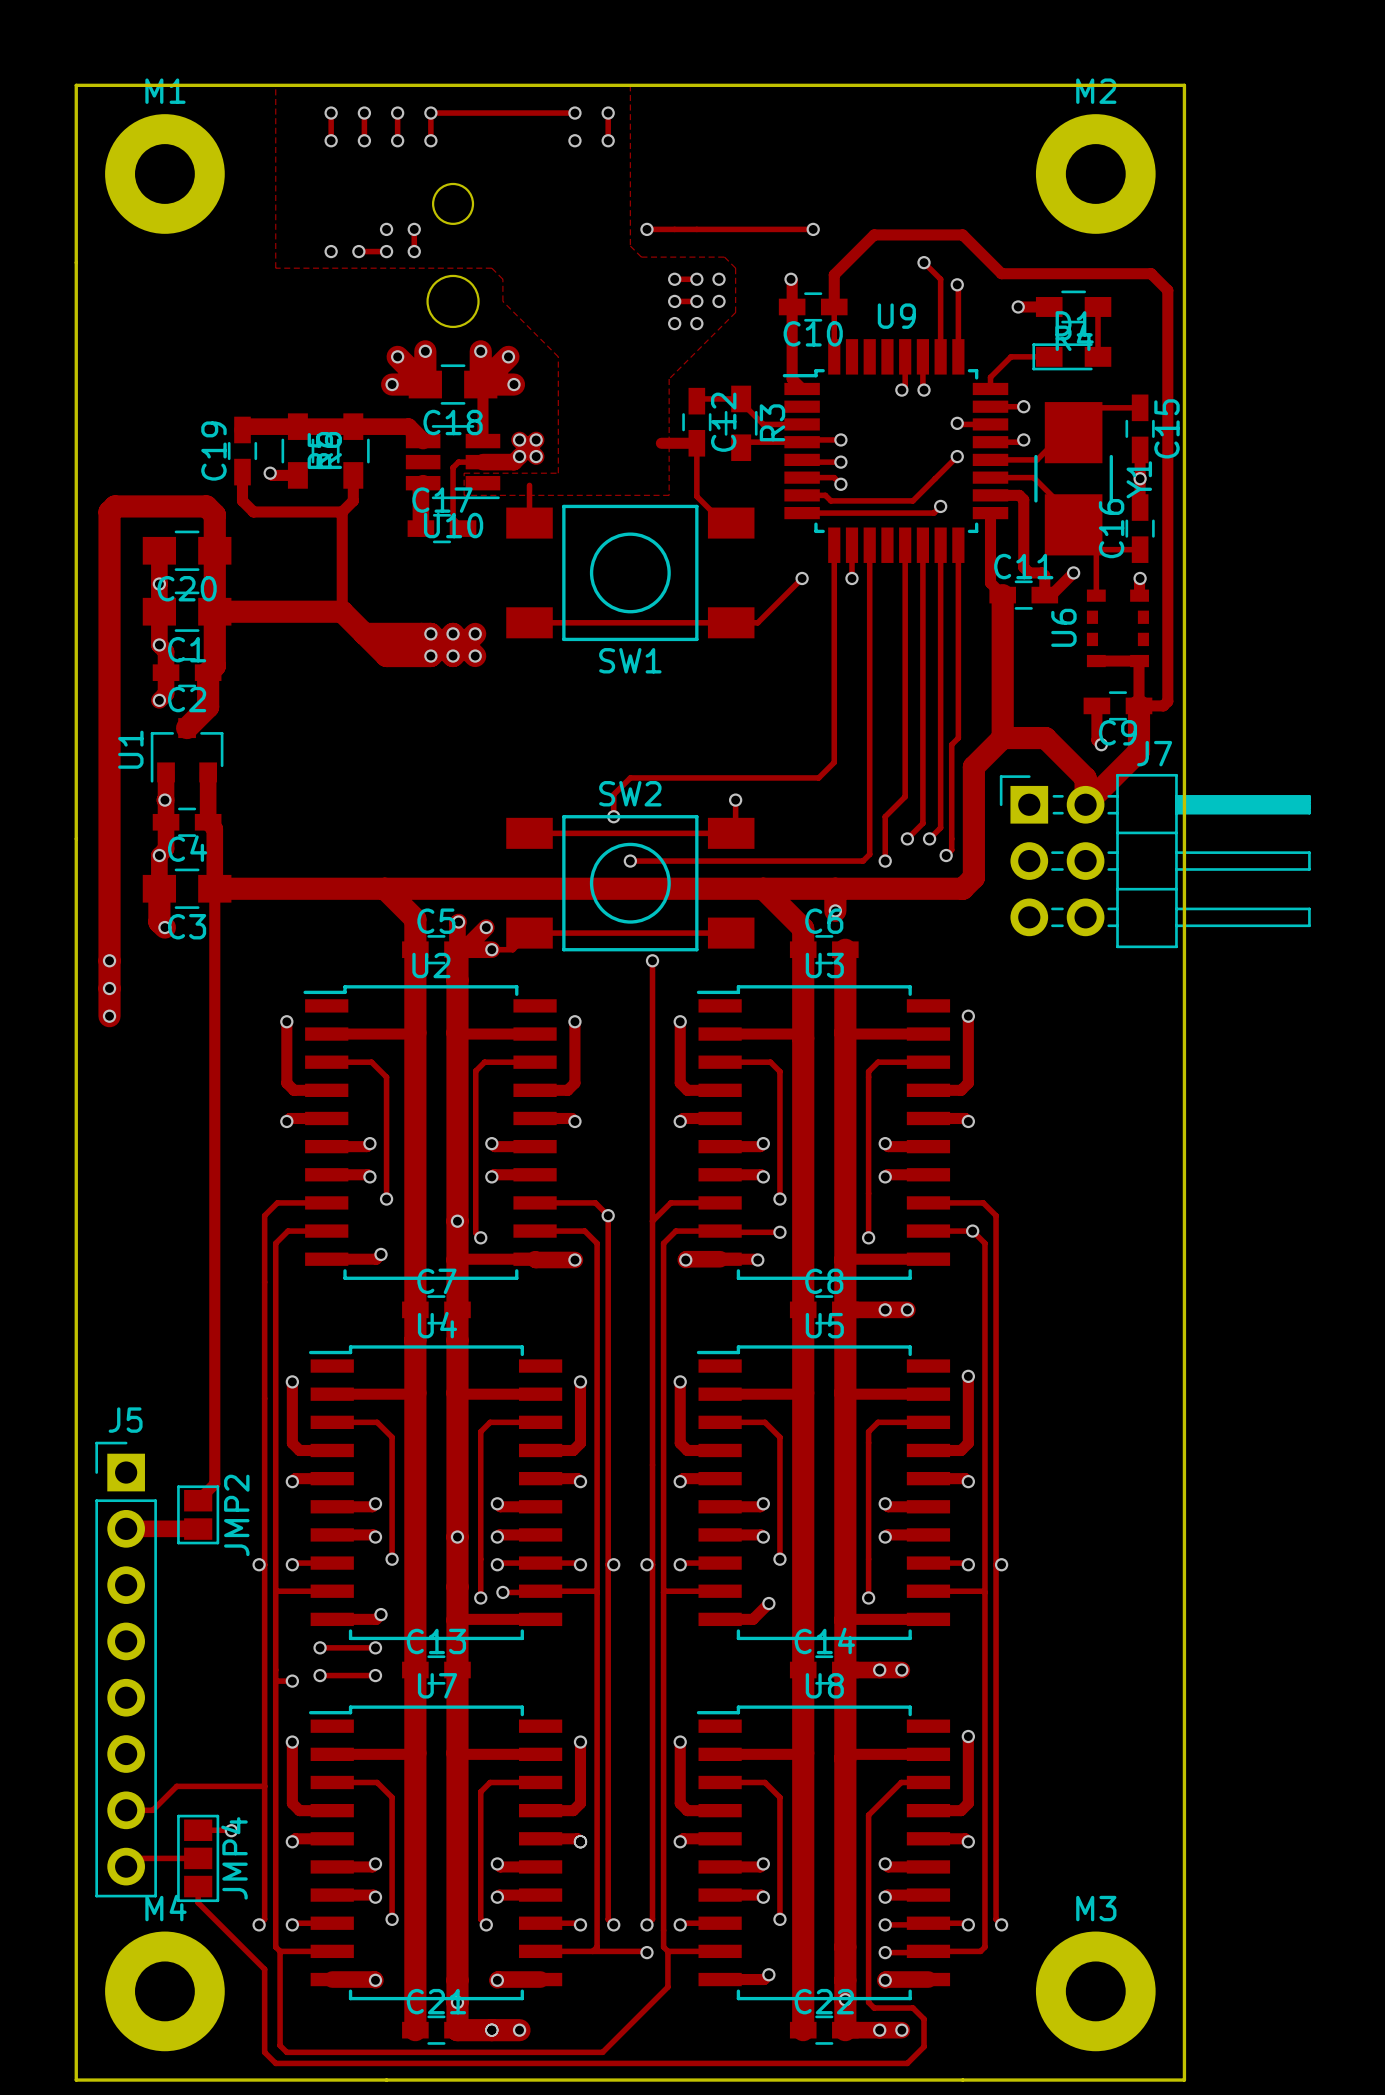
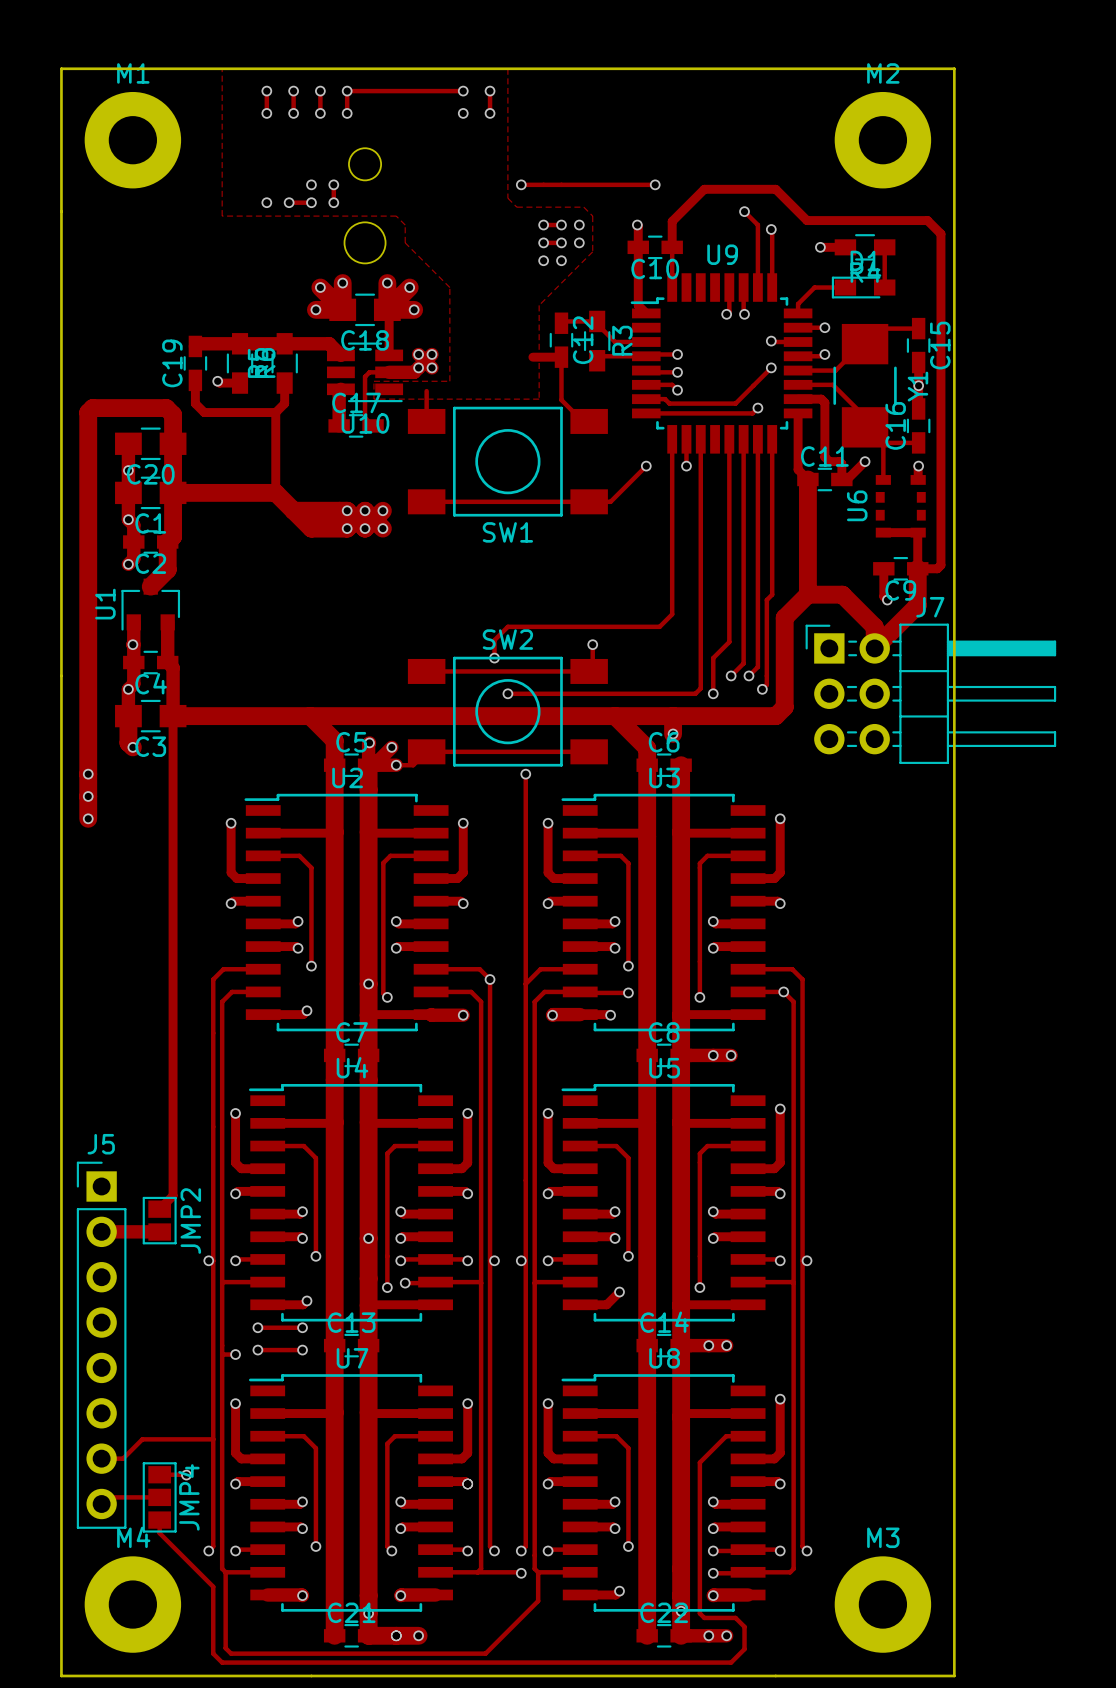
Y1 footprint: [1034, 402, 1113, 556] -> [833, 323, 897, 448]

